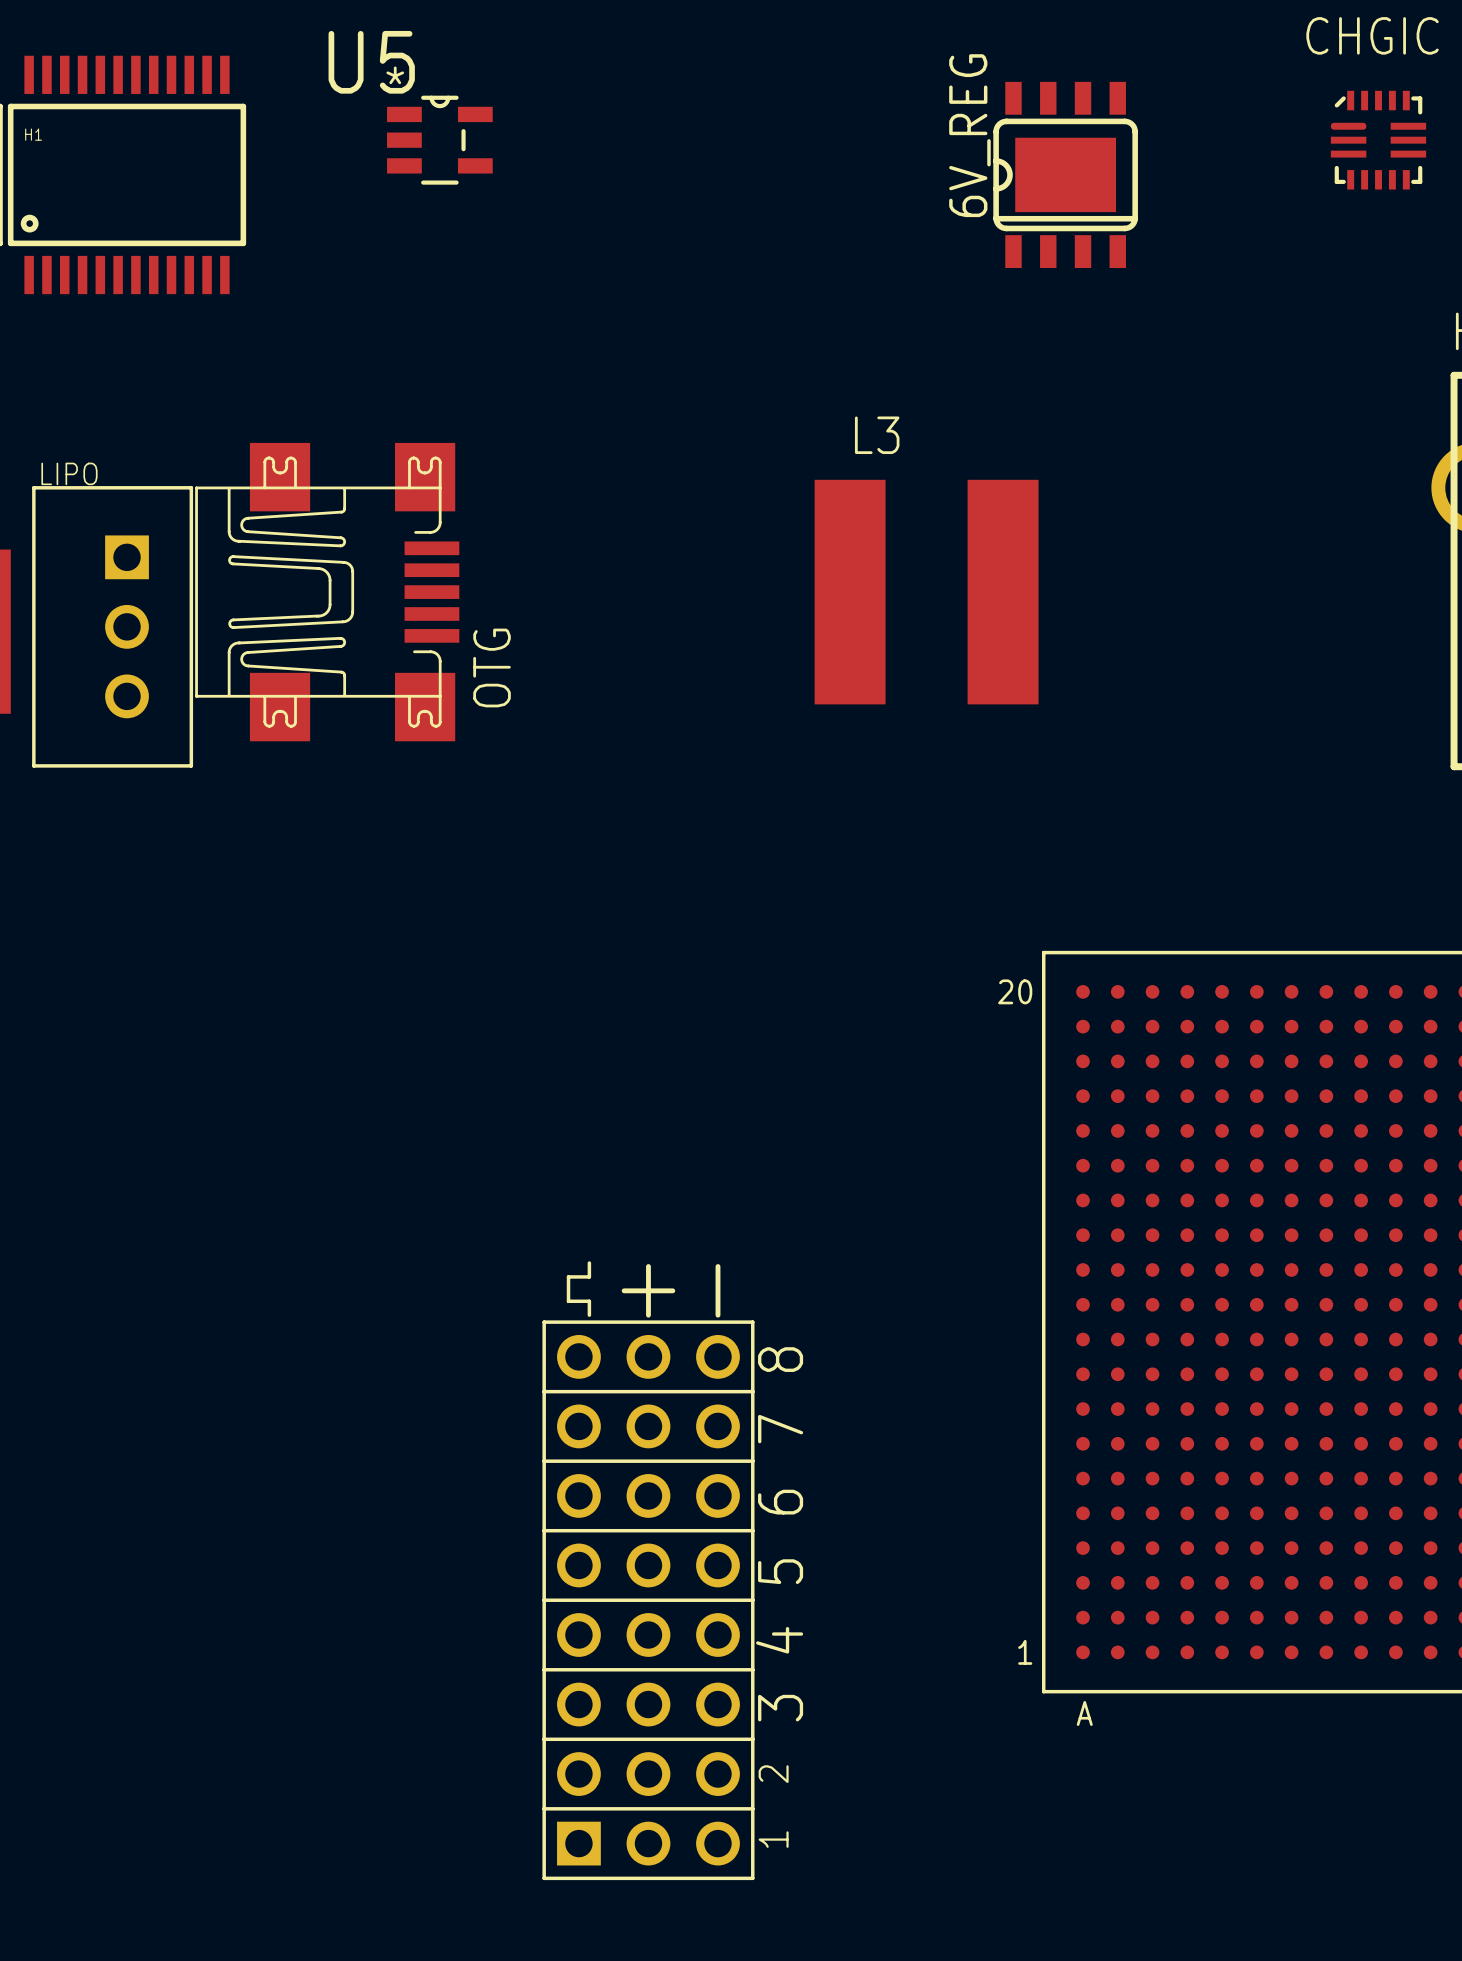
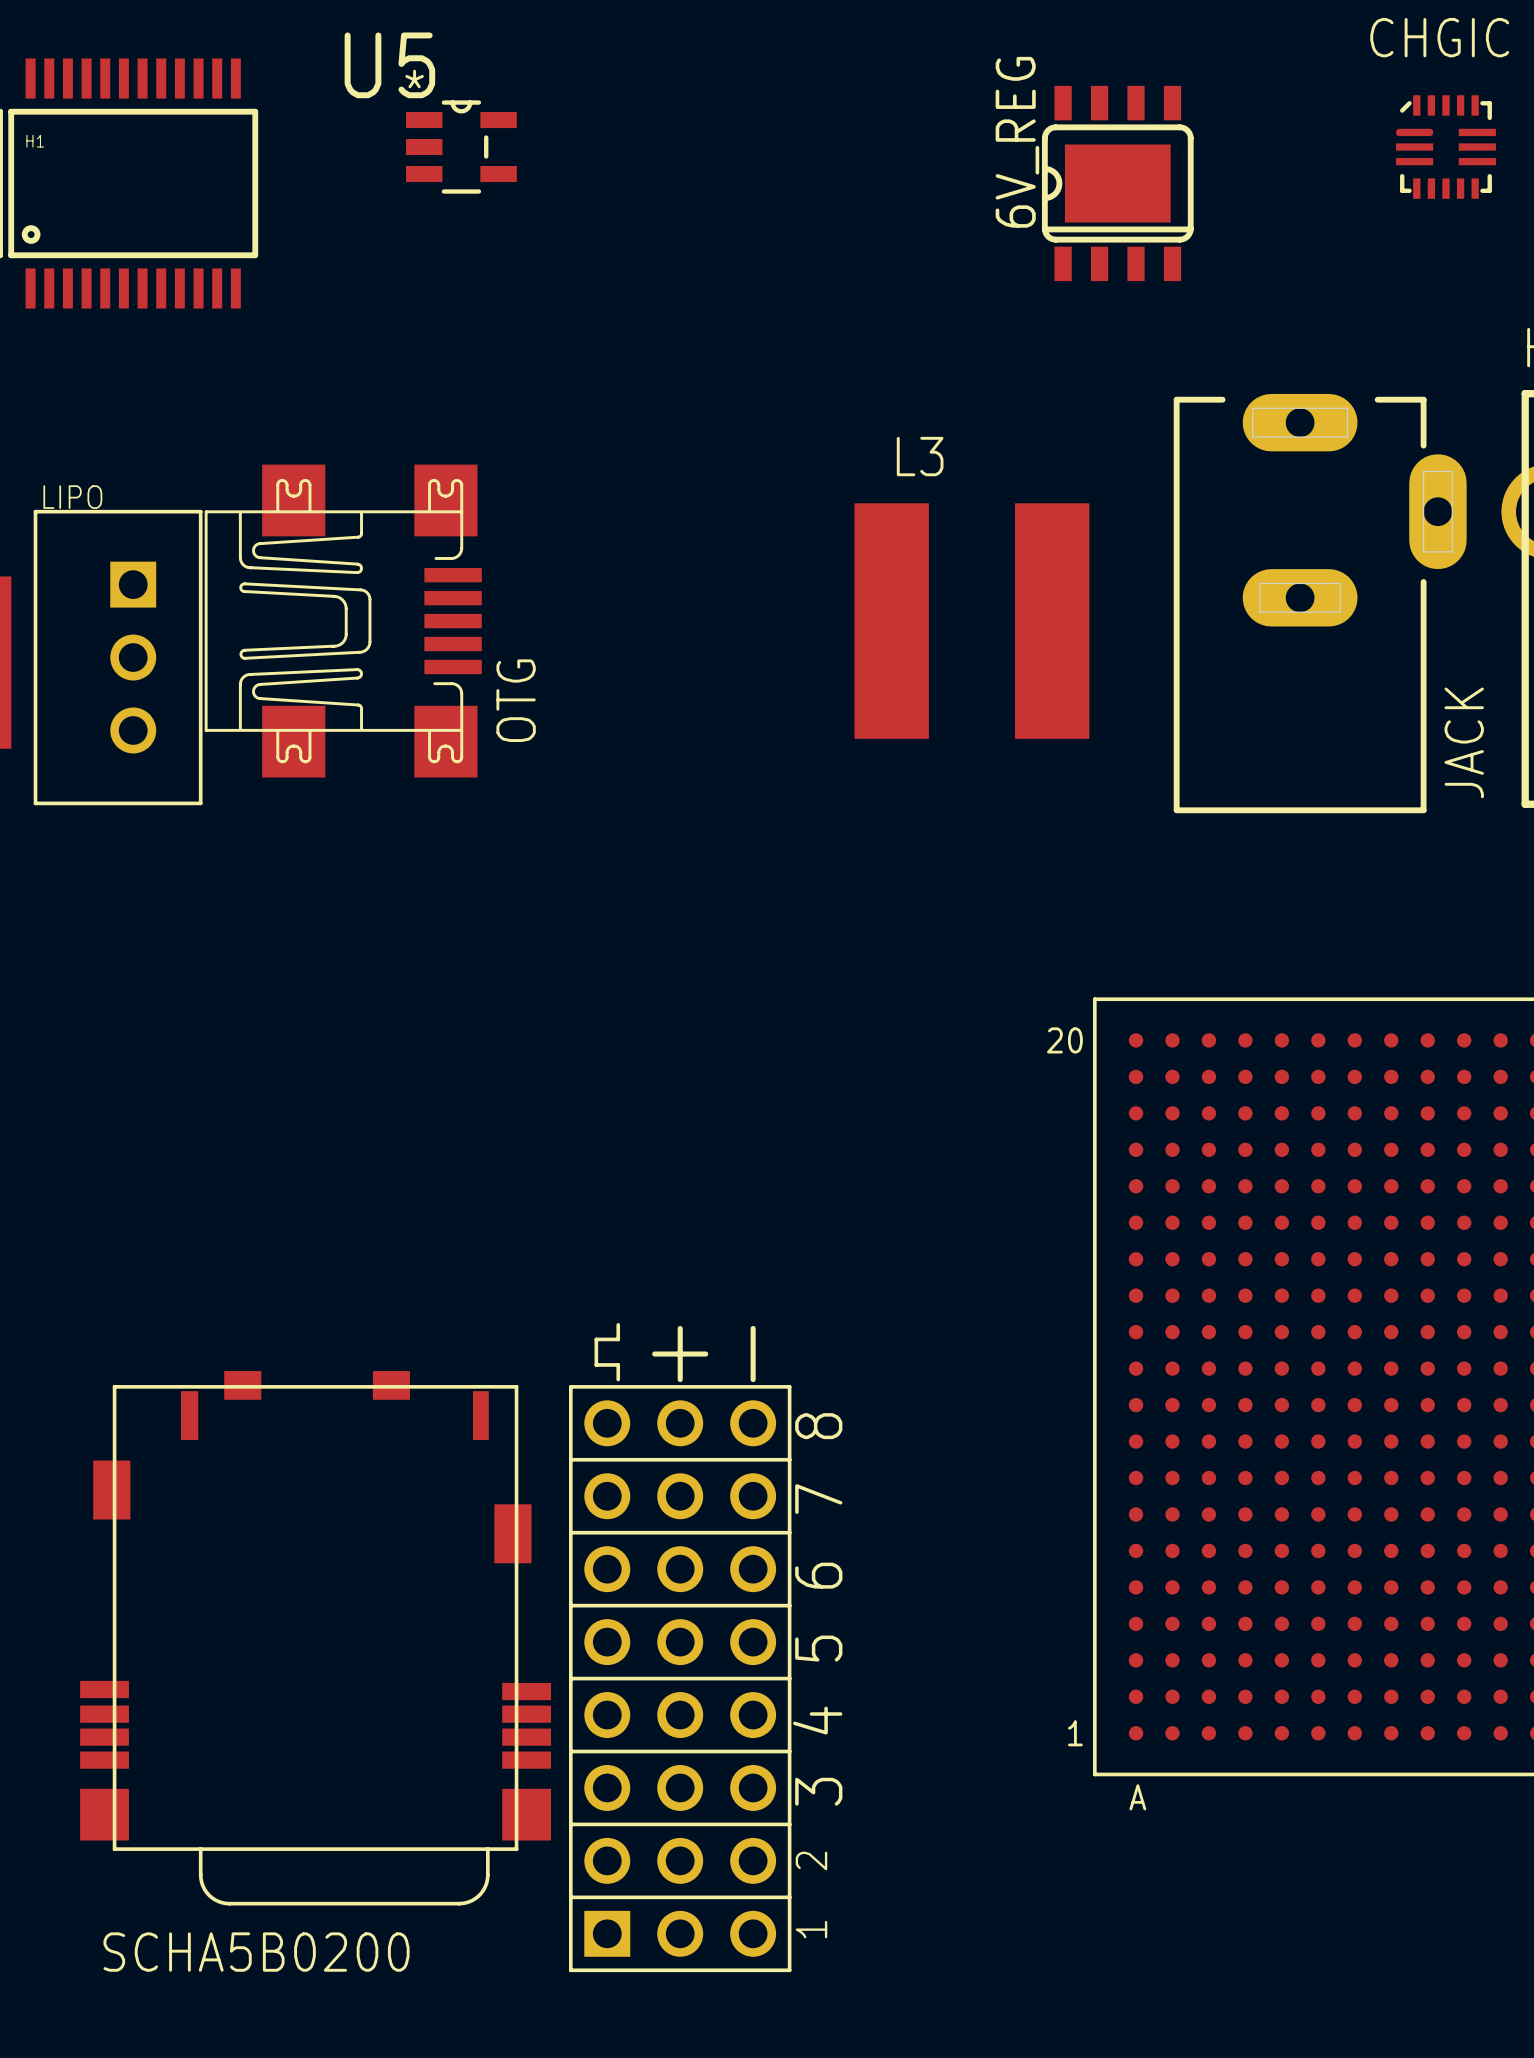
JACK: none -> (1320, 603)
part: none -> (315, 1638)

